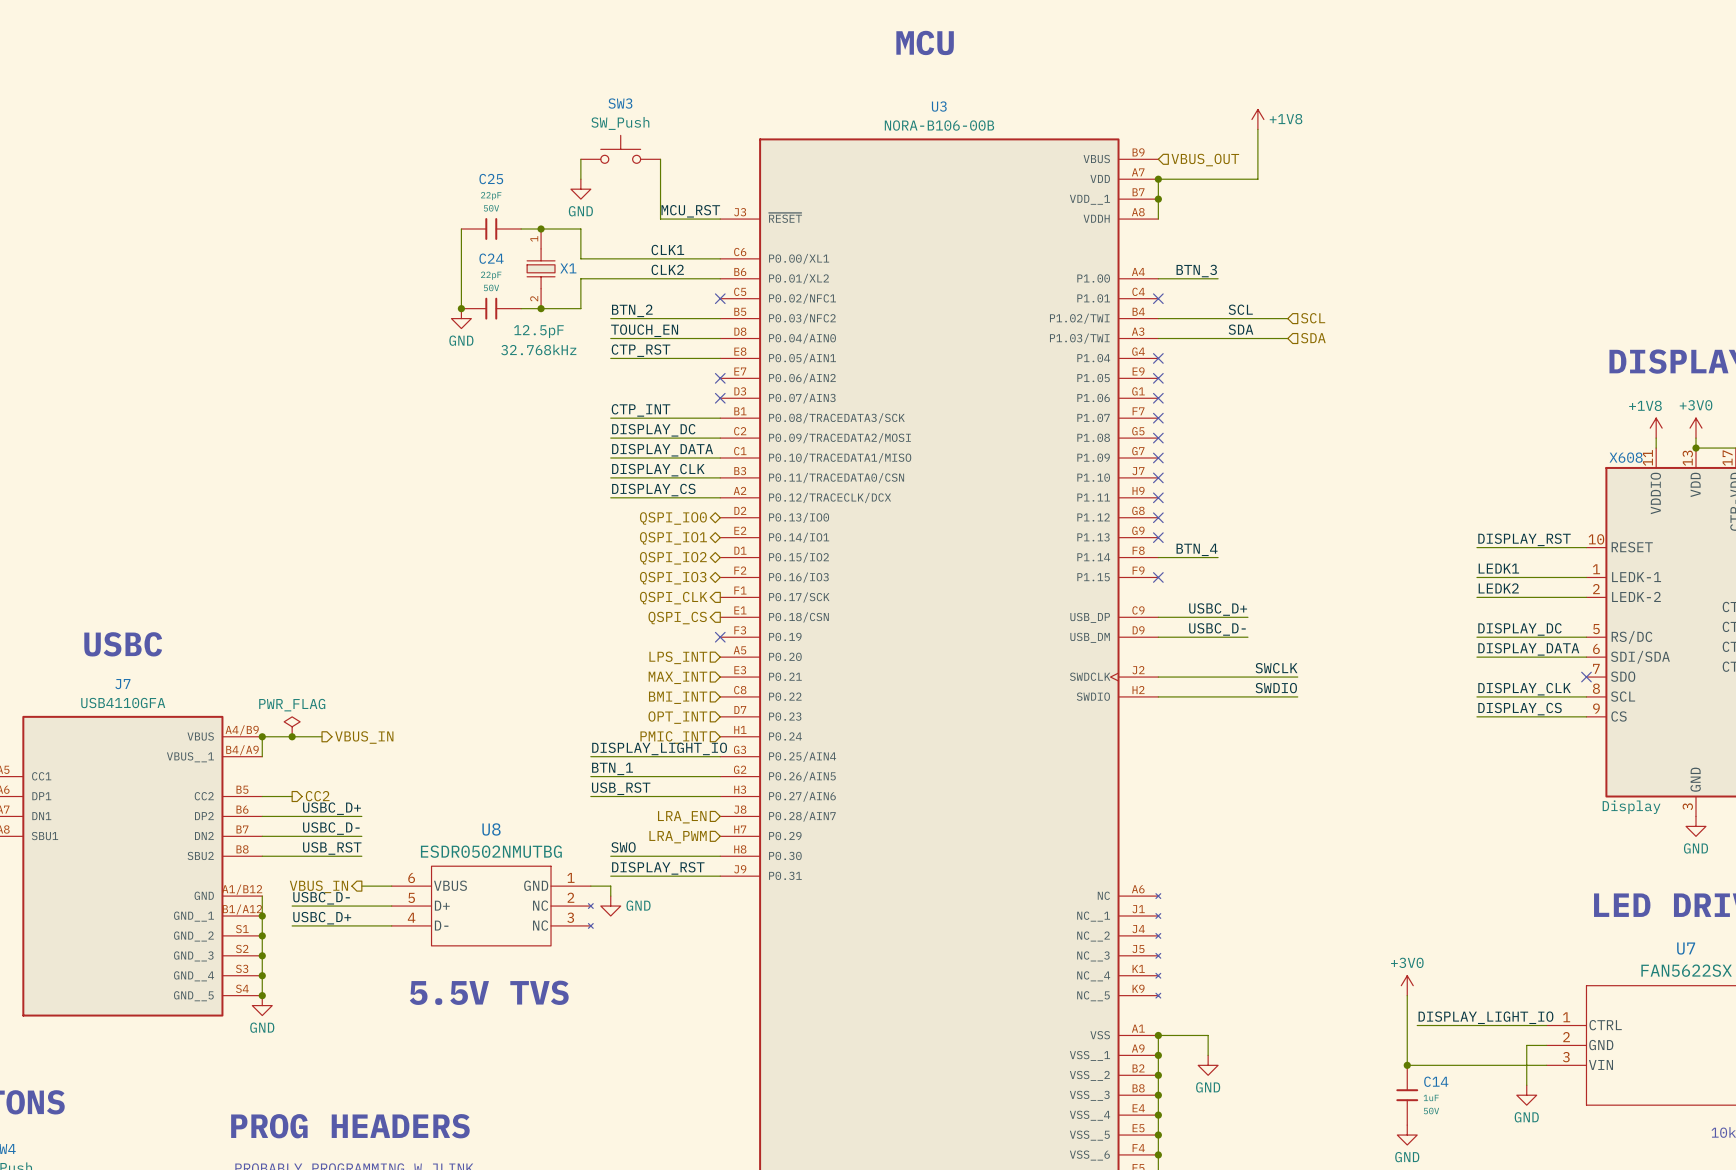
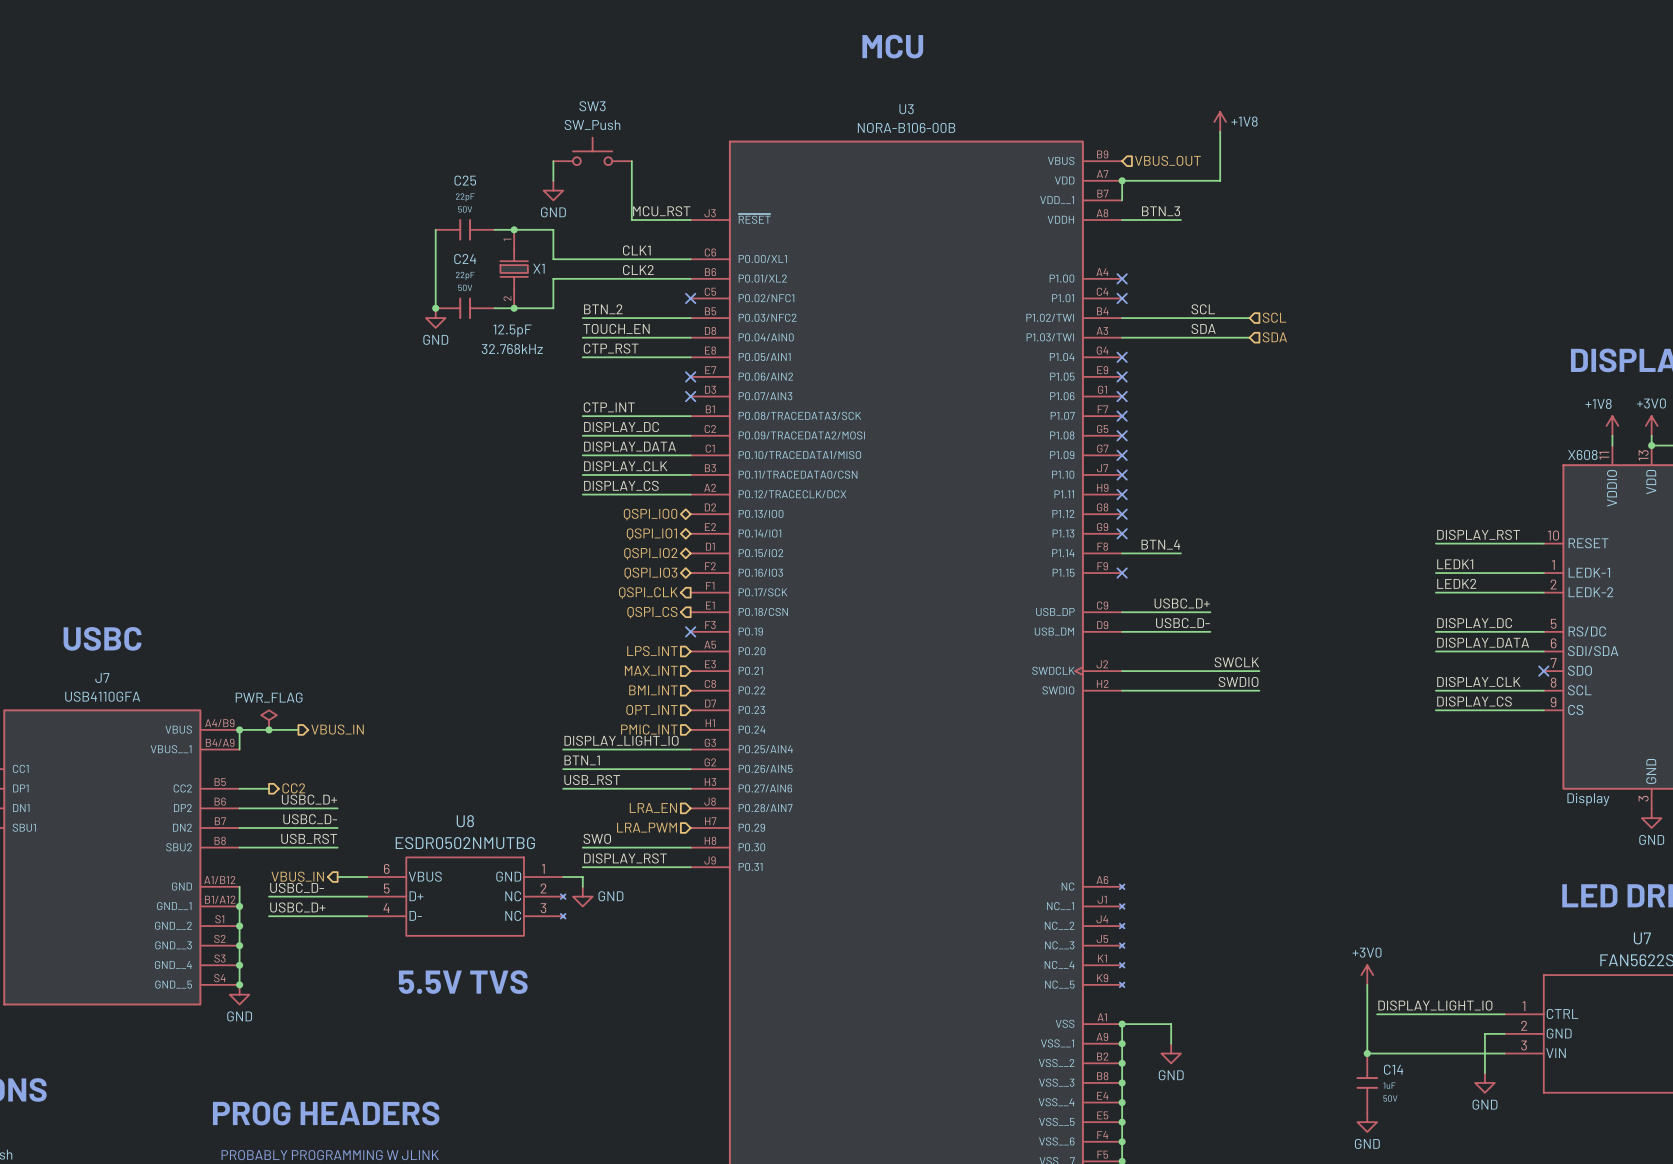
wire: (1158, 199) (1158, 219) -> (1180, 220) (1122, 220)
junction: (1158, 199) -> none
label position: BTN_3 (1196, 271) -> BTN_3 (1161, 211)
wire: (1158, 278) (1218, 278) -> none
no-connect mark: none -> (1122, 278)

